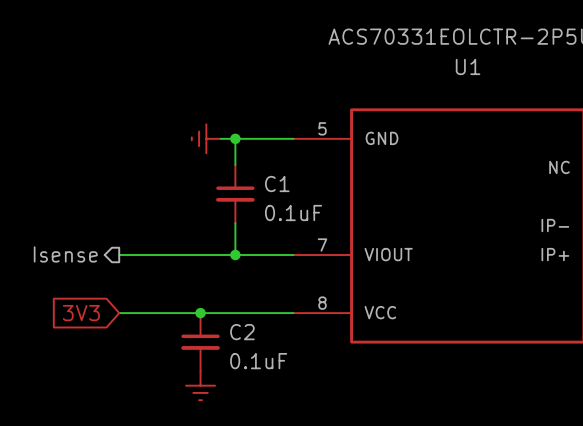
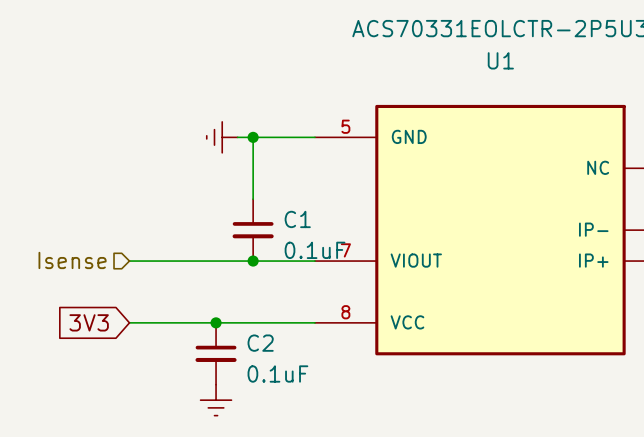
C1 position: (235, 194) -> (253, 230)
hierarchical label shape: output (65, 254) -> input (72, 260)

